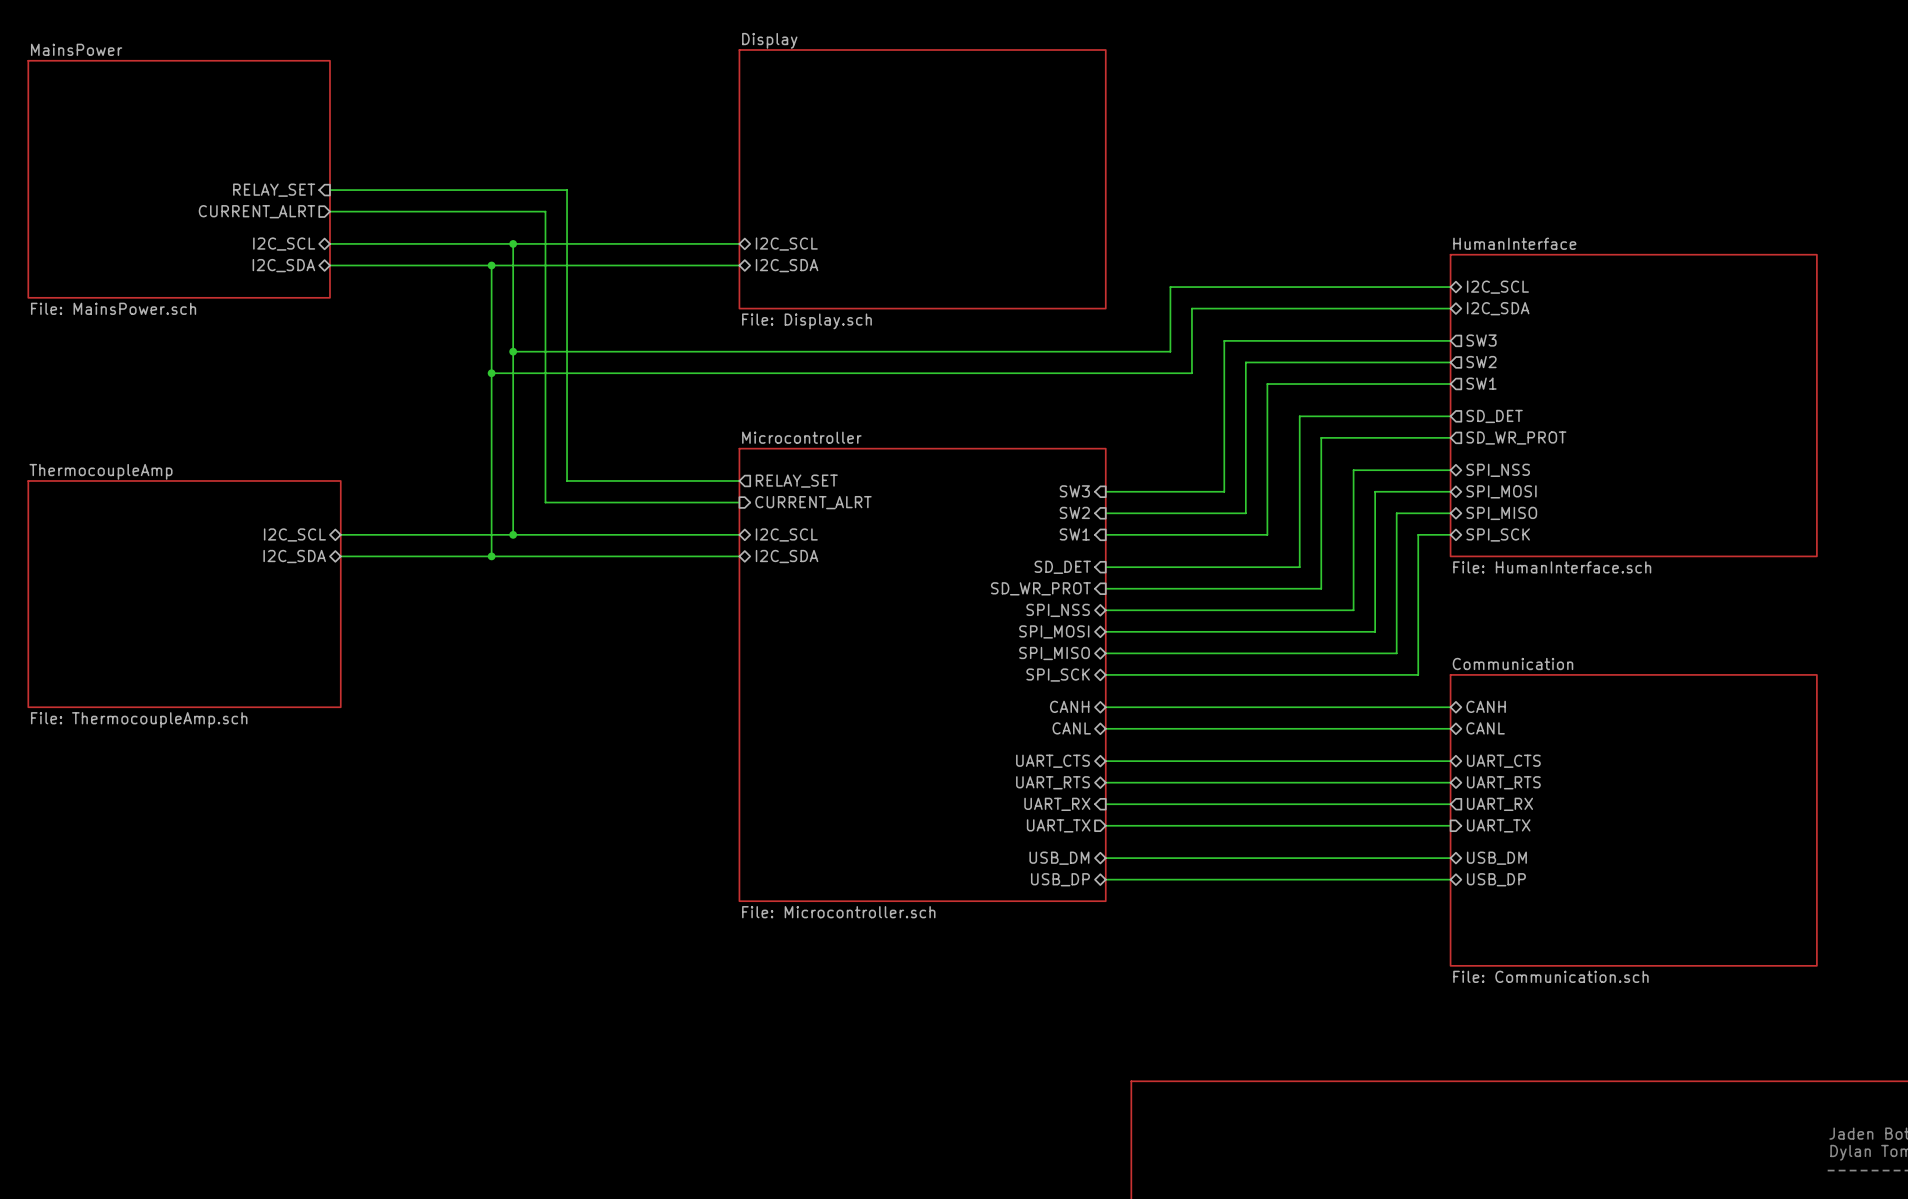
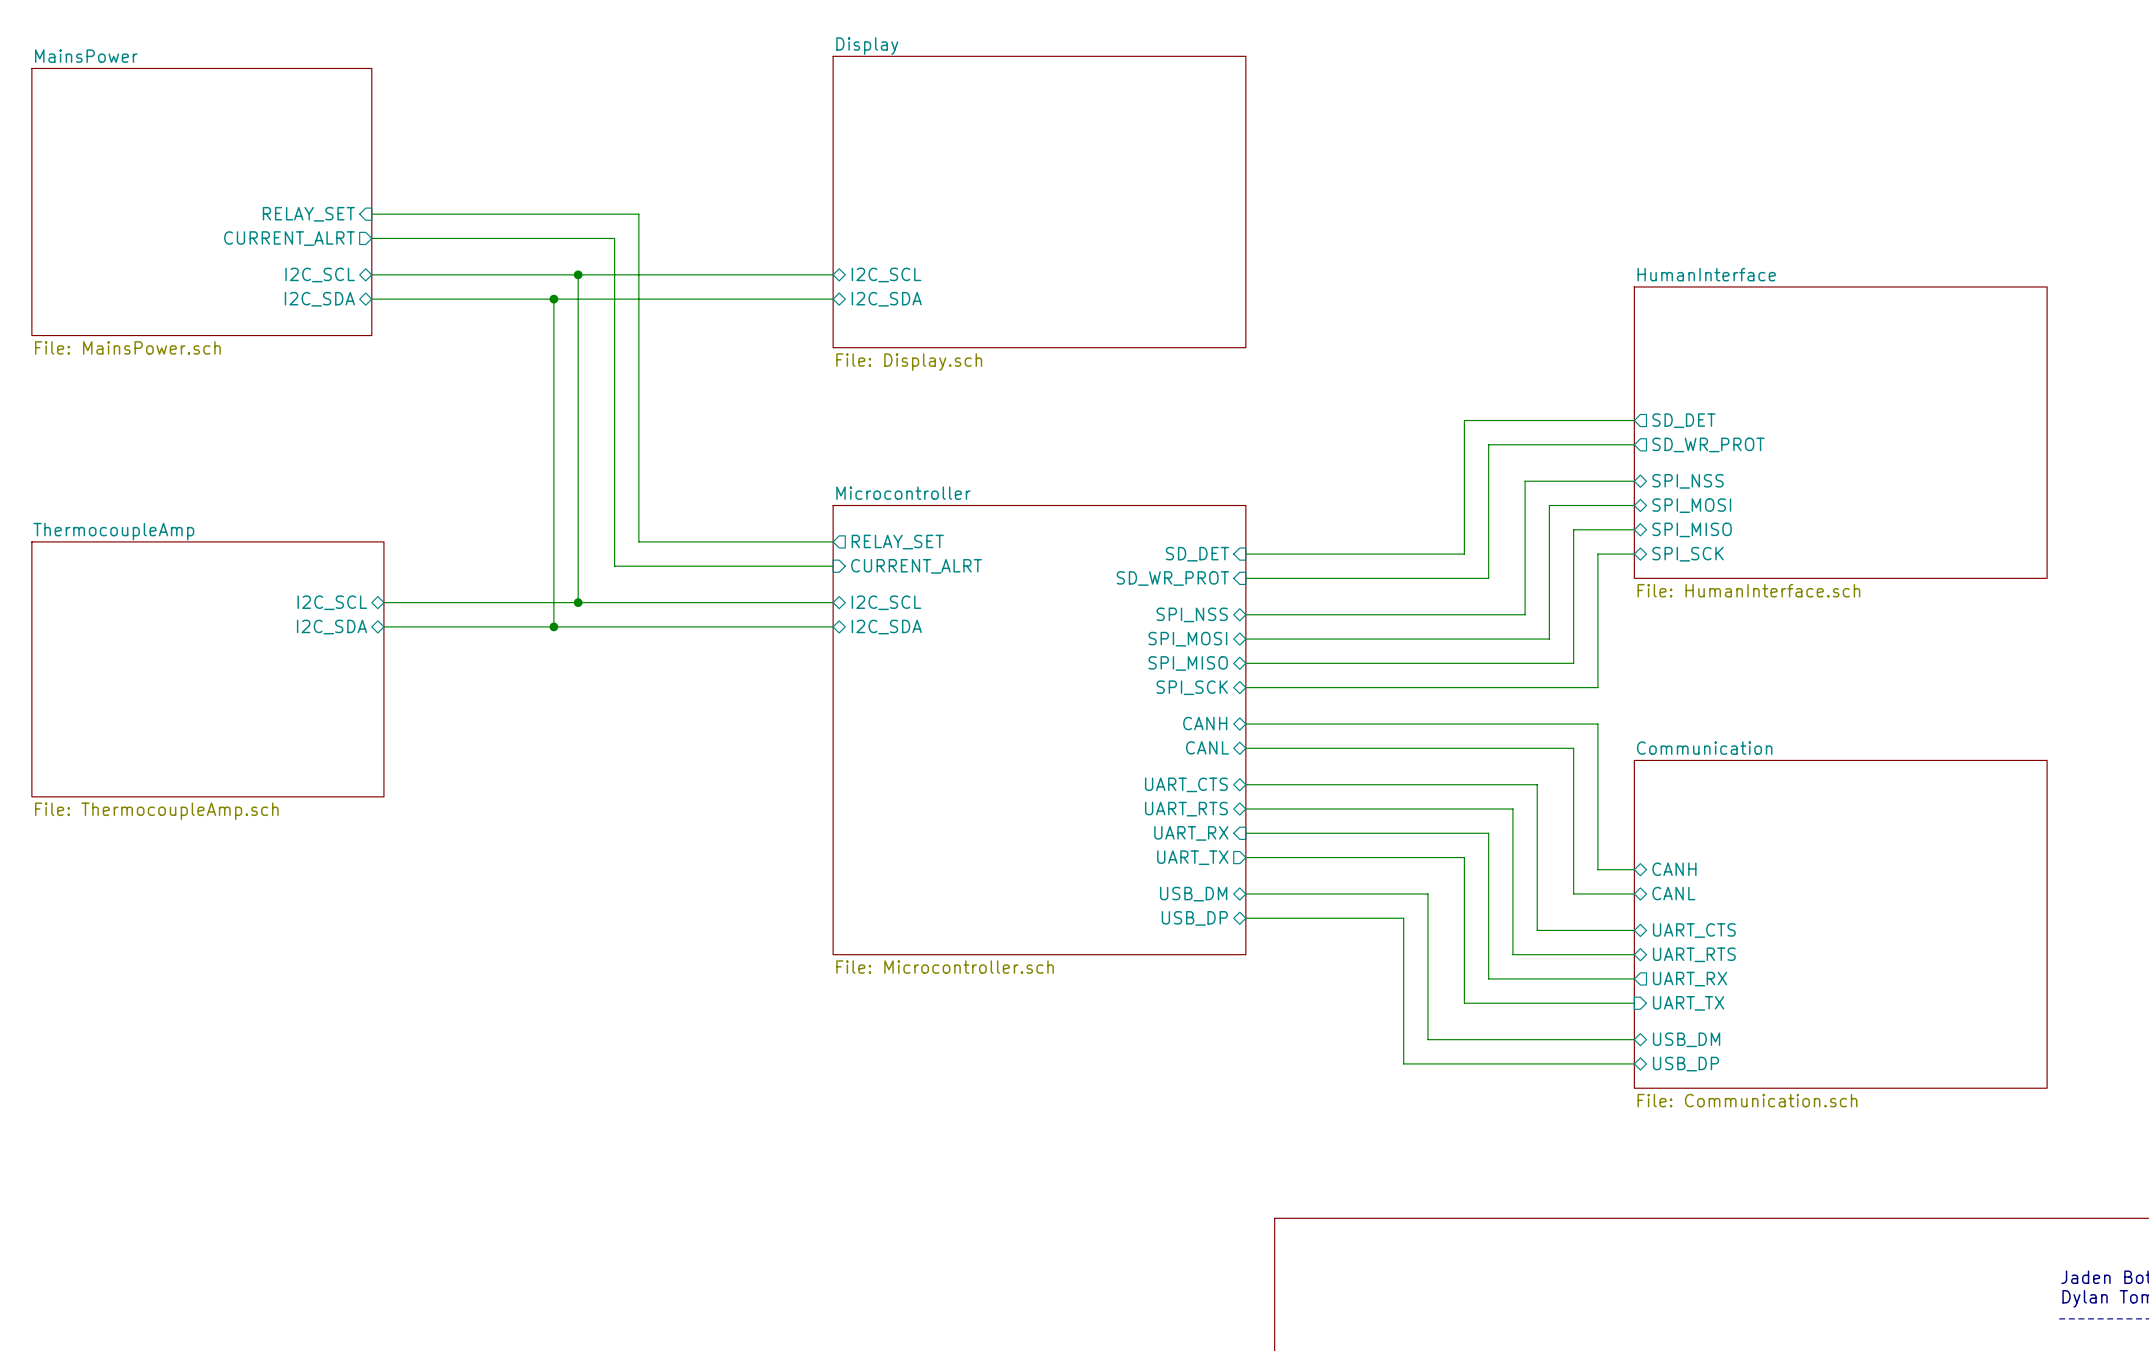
wire: (1450, 287) (1170, 287) (1170, 351) (513, 351) -> none
sheet pin: I2C_SCL (1497, 287) -> none
wire: (1450, 308) (1191, 308) (1191, 373) (491, 373) -> none
sheet pin: I2C_SDA (1498, 308) -> none
wire: (1450, 340) (1224, 340) (1224, 491) -> none
sheet pin: SW3 (1481, 340) -> none
junction: (513, 351) -> none
wire: (1450, 362) (1245, 362) (1245, 513) -> none
sheet pin: SW2 (1481, 362) -> none
junction: (491, 373) -> none
sheet pin: SW1 (1481, 383) -> none
wire: (1450, 384) (1267, 384) (1267, 534) (1105, 534) -> none
sheet HumanInterface: none -> File: HumanInterface.sch (1840, 432)
sheet HumanInterface: File: HumanInterface.sch (1633, 405) -> none
wire: (1299, 416) (1450, 416) -> (1464, 469) (1464, 420) (1634, 420)
sheet pin position: SD_DET (1494, 416) -> SD_DET (1683, 420)
wire: none -> (1634, 481) (1525, 481) (1525, 529)
sheet pin: none -> SPI_NSS (1688, 481)
wire: (1321, 437) (1450, 437) -> (1488, 493) (1488, 444) (1634, 444)
sheet pin position: SD_WR_PROT (1516, 437) -> SD_WR_PROT (1708, 444)
sheet pin: none -> SPI_MOSI (1691, 505)
wire: (1353, 470) (1396, 470) -> (1573, 578) (1573, 529)
sheet pin: SPI_NSS (1498, 470) -> SPI_MISO (1692, 529)
sheet pin: SW3 (1074, 491) -> SD_DET (1197, 554)
wire: (1299, 491) (1299, 567) -> (1464, 554) (1379, 554)
wire: (1375, 491) (1418, 491) -> (1549, 554) (1549, 505) (1634, 505)
sheet pin: SPI_MOSI (1501, 491) -> SPI_SCK (1688, 554)
sheet pin: SW2 (1074, 512) -> SD_WR_PROT (1172, 578)
wire: (1321, 513) (1321, 588) -> (1488, 578) (1403, 578)
wire: (1396, 513) (1450, 513) -> none
sheet pin: SPI_MISO (1501, 513) -> none
sheet pin: SW1 (1074, 534) -> none
wire: (1418, 534) (1450, 534) -> (1597, 602) (1597, 554)
sheet pin: SPI_SCK (1498, 534) -> none
sheet pin: none -> SPI_NSS (1192, 614)
wire: (1353, 545) (1353, 610) -> (1525, 614) (1245, 614)
sheet pin shape: input (1062, 567) -> bidirectional (1187, 639)
sheet pin: SD_DET (1062, 567) -> SPI_MOSI (1187, 639)
wire: (1375, 567) (1375, 631) (1105, 631) -> (1549, 639) (1464, 639)
sheet pin shape: input (1040, 588) -> bidirectional (1188, 663)
sheet pin: SD_WR_PROT (1040, 588) -> SPI_MISO (1188, 663)
wire: (1396, 588) (1396, 653) (1105, 653) -> (1573, 663) (1488, 663)
sheet pin: SPI_NSS (1058, 610) -> SPI_SCK (1192, 687)
wire: (1418, 610) (1418, 642) -> (1597, 687) (1525, 687)
sheet pin: SPI_MOSI (1054, 631) -> none
wire: none -> (1245, 724) (1597, 724)
sheet Microcontroller: none -> File: Microcontroller.sch (1039, 730)
sheet pin: SPI_MISO (1054, 653) -> none
wire: none -> (1245, 748) (1573, 748) (1573, 893) (1634, 893)
sheet Microcontroller: File: Microcontroller.sch (922, 674) -> none
wire: (1105, 674) (1418, 674) -> (1634, 869) (1597, 869) (1597, 760)
sheet pin: SPI_SCK (1058, 675) -> none
sheet pin: none -> UART_CTS (1186, 784)
sheet pin position: CANH (1069, 706) -> CANH (1205, 723)
sheet pin position: CANH (1486, 706) -> CANH (1674, 869)
wire: (1105, 707) (1450, 707) -> none
wire: none -> (1245, 809) (1512, 809) (1512, 954) (1634, 954)
sheet pin position: CANL (1071, 728) -> CANL (1207, 747)
wire: (1105, 728) (1450, 728) -> none
sheet pin position: CANL (1485, 728) -> CANL (1673, 893)
wire: none -> (1245, 833) (1488, 833) (1488, 978) (1634, 978)
sheet pin shape: bidirectional (1053, 761) -> output (1192, 857)
sheet pin: UART_CTS (1053, 761) -> UART_TX (1192, 857)
wire: (1299, 761) (1450, 761) -> (1464, 857) (1464, 1003) (1634, 1003)
sheet pin: UART_CTS (1503, 761) -> none
sheet pin position: UART_RTS (1053, 782) -> UART_RTS (1186, 809)
wire: (1105, 782) (1450, 782) -> none
sheet pin position: UART_RTS (1503, 782) -> UART_RTS (1694, 954)
wire: none -> (1245, 893) (1427, 893) (1427, 1039) (1634, 1039)
sheet pin position: UART_RX (1057, 804) -> UART_RX (1191, 833)
wire: (1105, 804) (1450, 804) -> none
sheet pin position: UART_RX (1499, 804) -> UART_RX (1690, 979)
wire: none -> (1245, 918) (1403, 918) (1403, 1063) (1634, 1063)
sheet pin: UART_TX (1058, 825) -> none
wire: (1105, 825) (1364, 825) -> (1245, 784) (1537, 784) (1537, 930)
sheet pin shape: input (1498, 825) -> bidirectional (1694, 930)
sheet pin: UART_TX (1498, 825) -> UART_CTS (1694, 930)
sheet pin position: USB_DM (1059, 858) -> USB_DM (1193, 894)
wire: (1105, 858) (1450, 858) -> none
sheet pin position: USB_DM (1496, 858) -> USB_DM (1686, 1039)
sheet pin position: USB_DP (1060, 879) -> USB_DP (1194, 918)
wire: (1105, 879) (1450, 879) -> none
sheet pin position: USB_DP (1496, 879) -> USB_DP (1685, 1064)
sheet pin: none -> UART_TX (1688, 1003)

